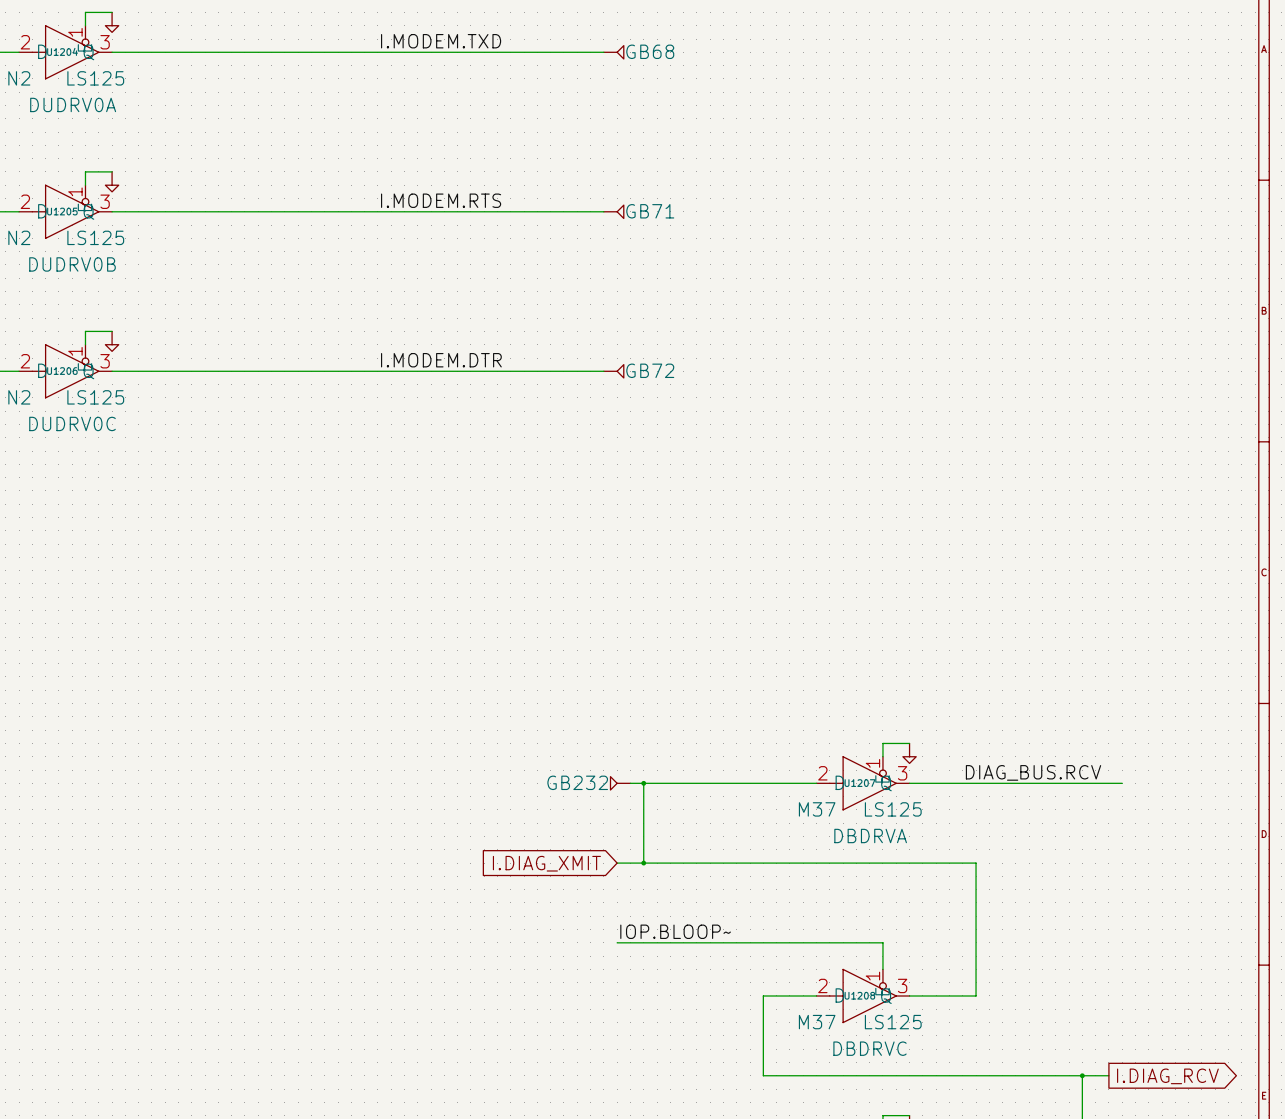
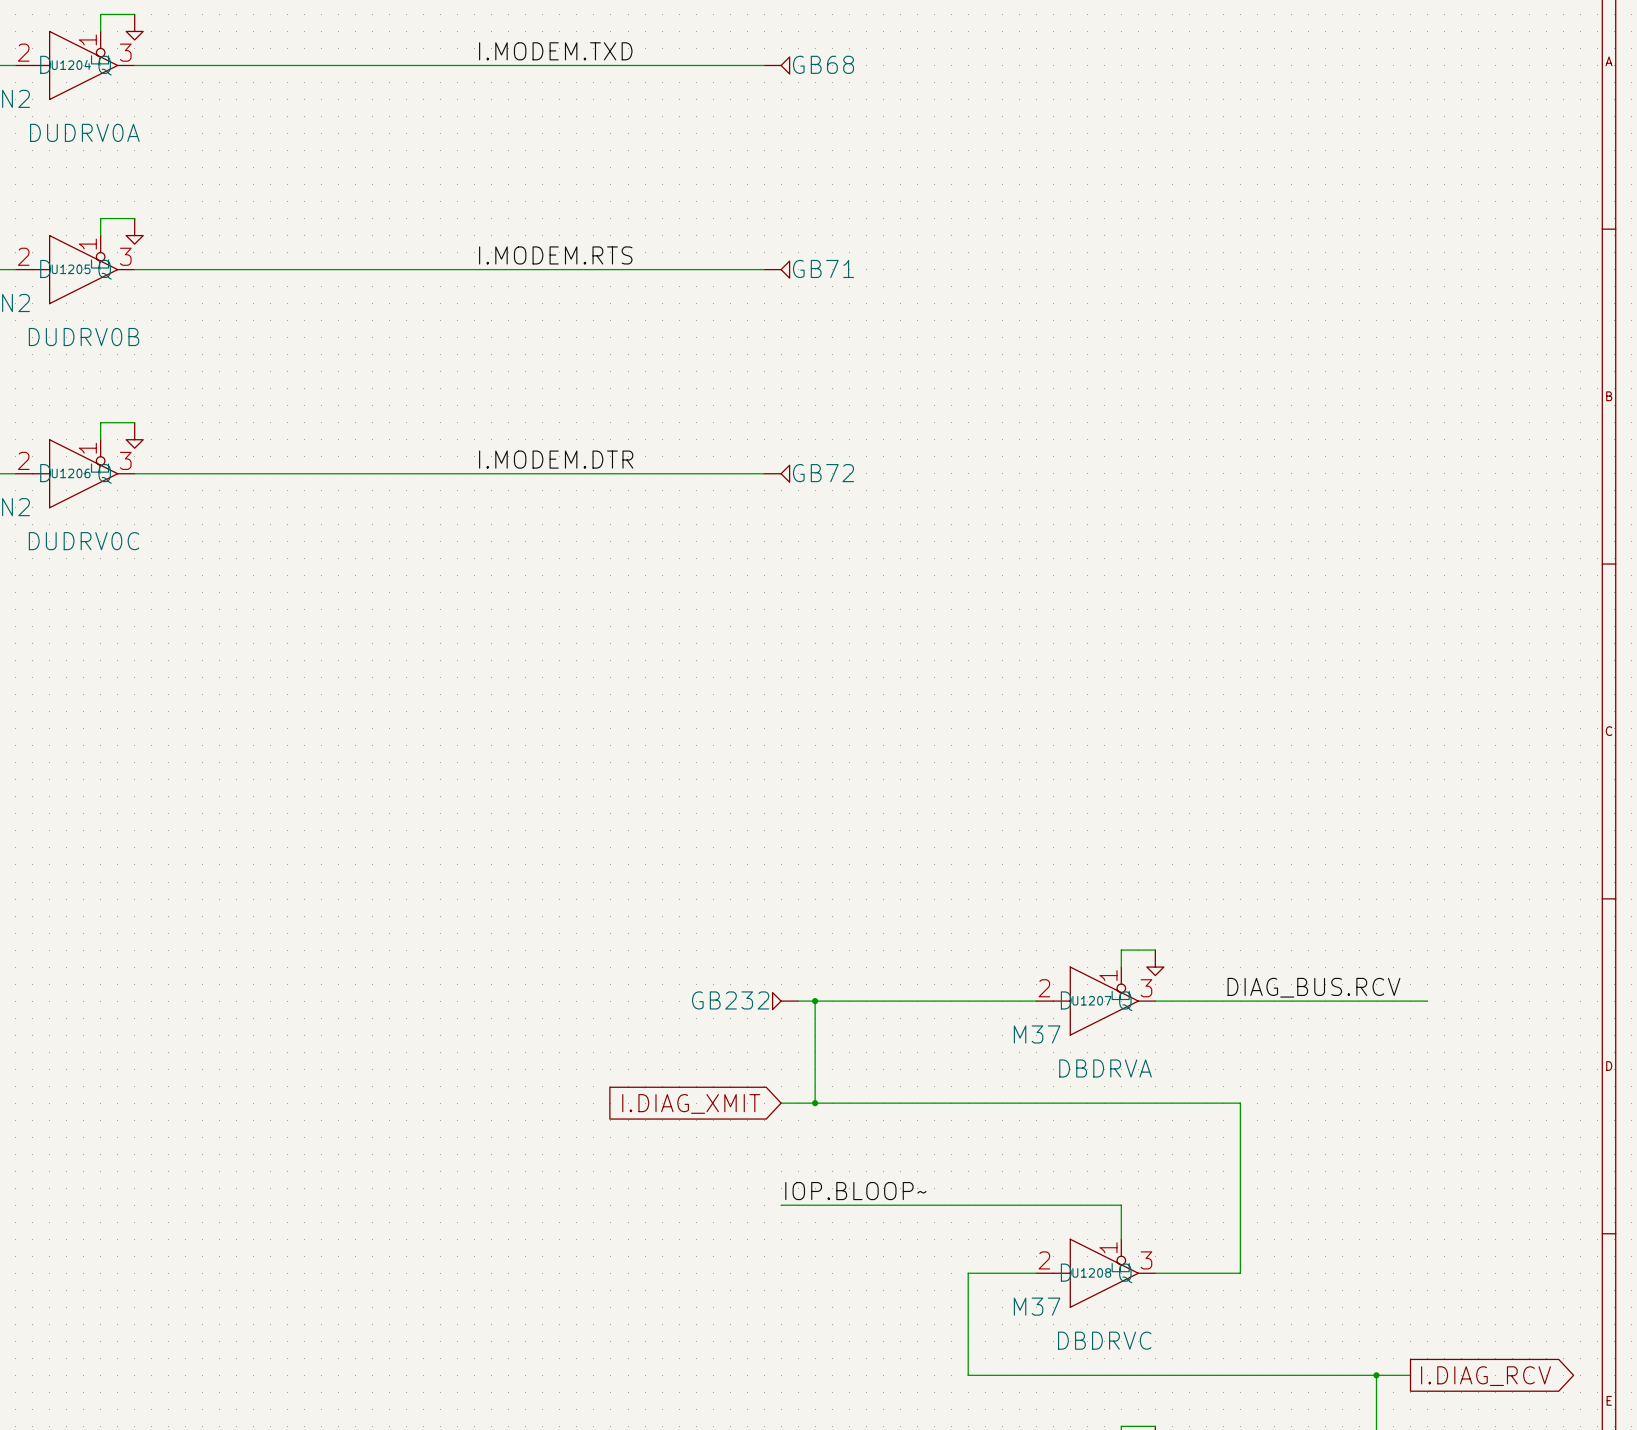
U1204 value: LS125 (95, 78) -> none
U1205 value: LS125 (95, 237) -> none
U1206 value: LS125 (95, 397) -> none
U1207 value: LS125 (893, 809) -> none
U1208 value: LS125 (893, 1022) -> none

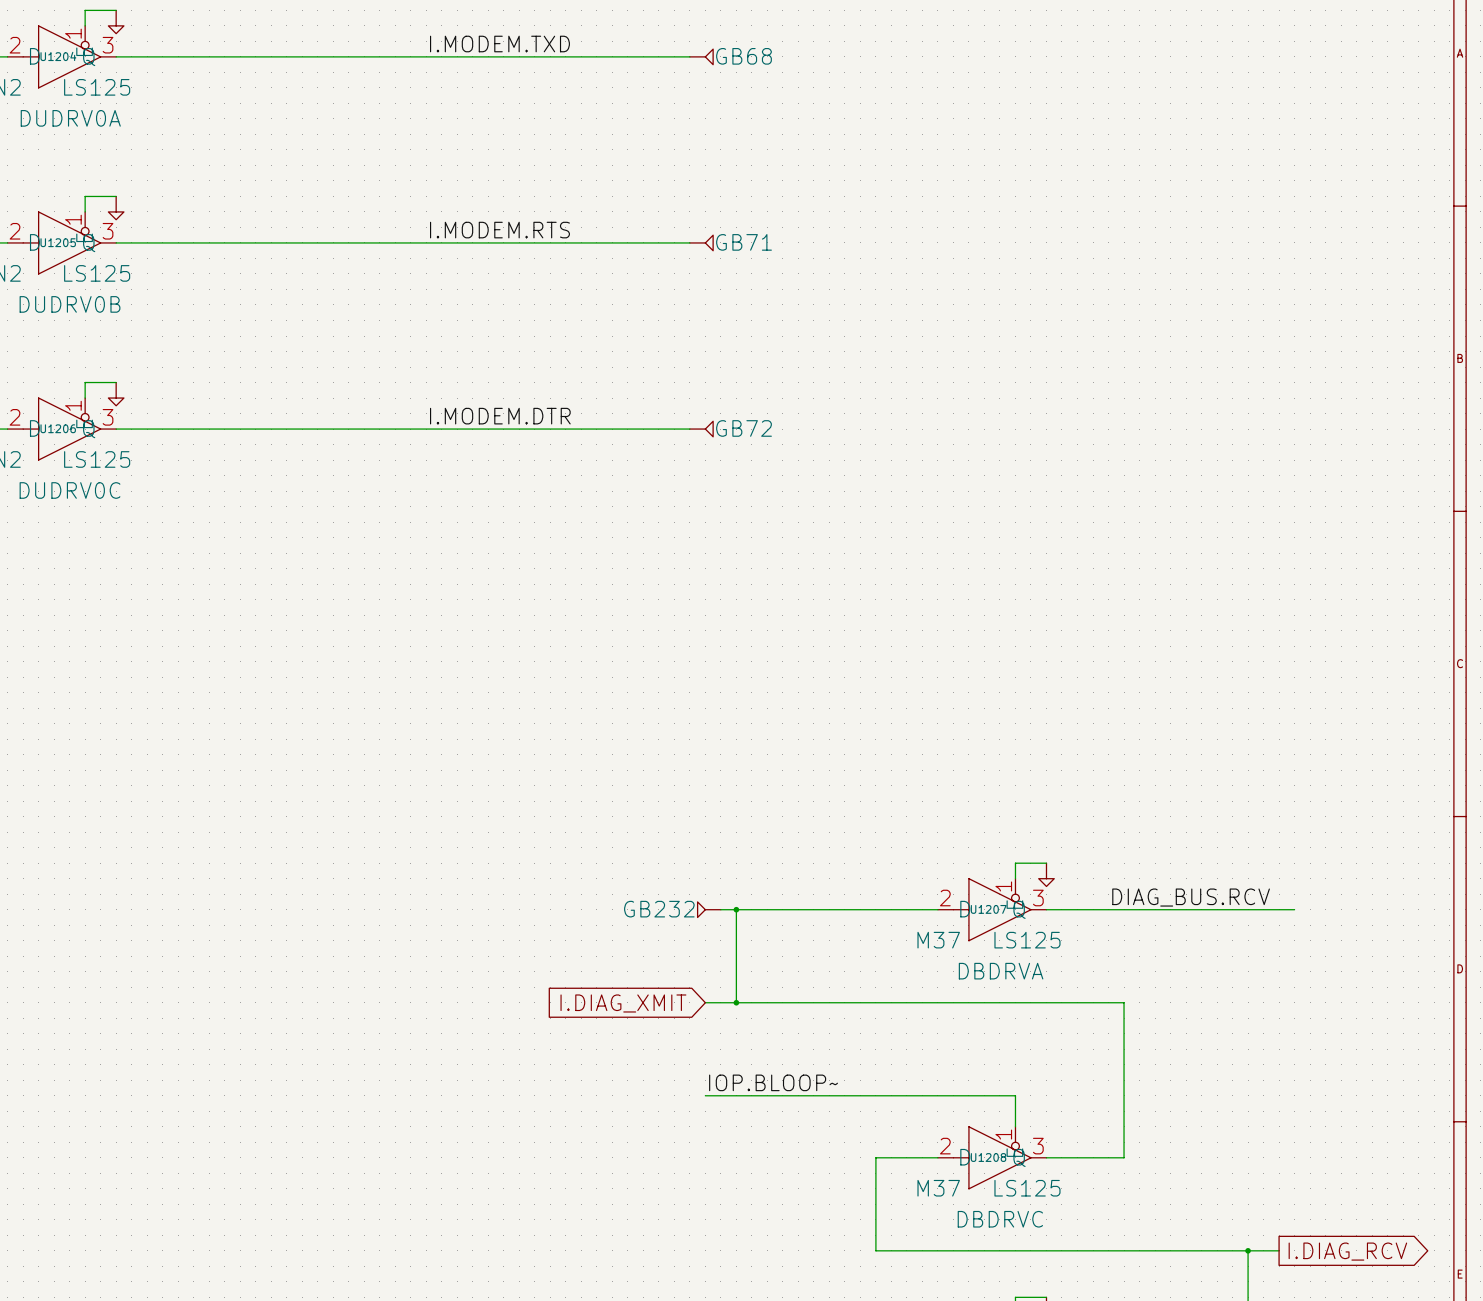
U1204 value: none -> LS125 (97, 87)
U1205 value: none -> LS125 (97, 273)
U1206 value: none -> LS125 (97, 459)
U1207 value: none -> LS125 (1027, 940)
U1208 value: none -> LS125 (1027, 1188)

